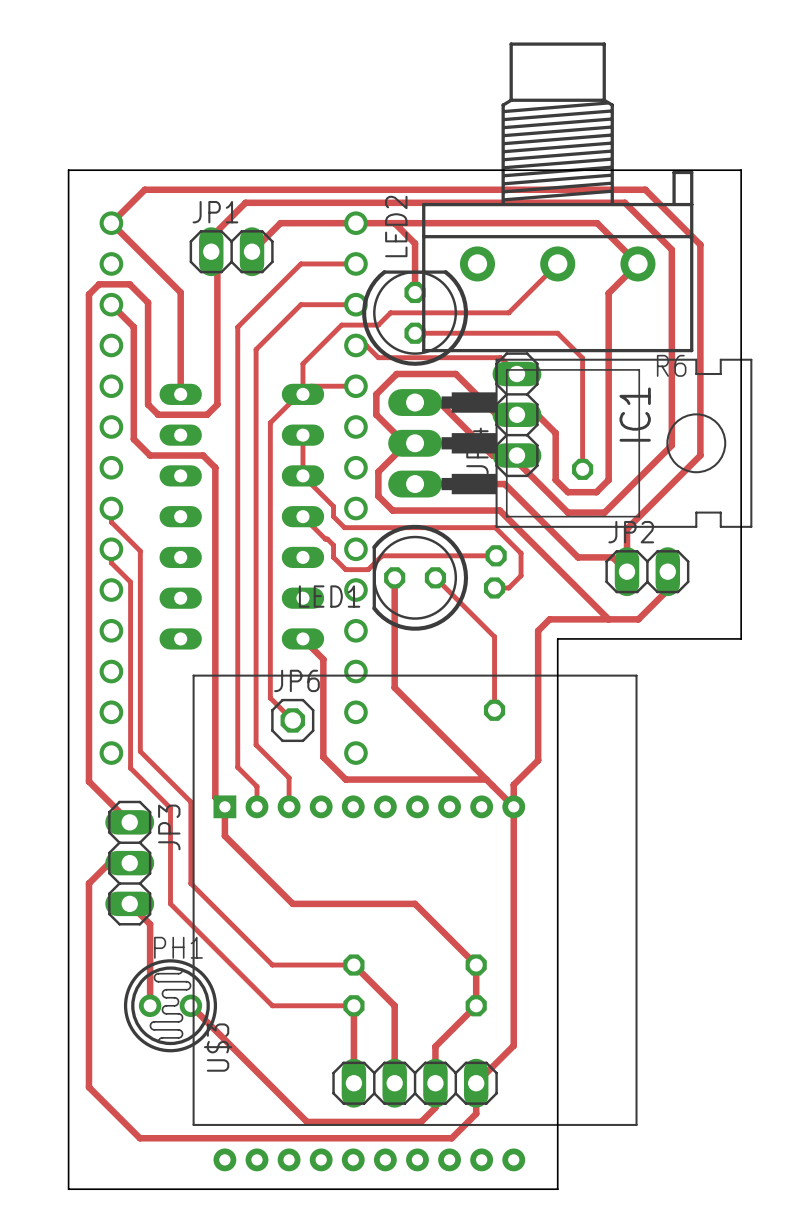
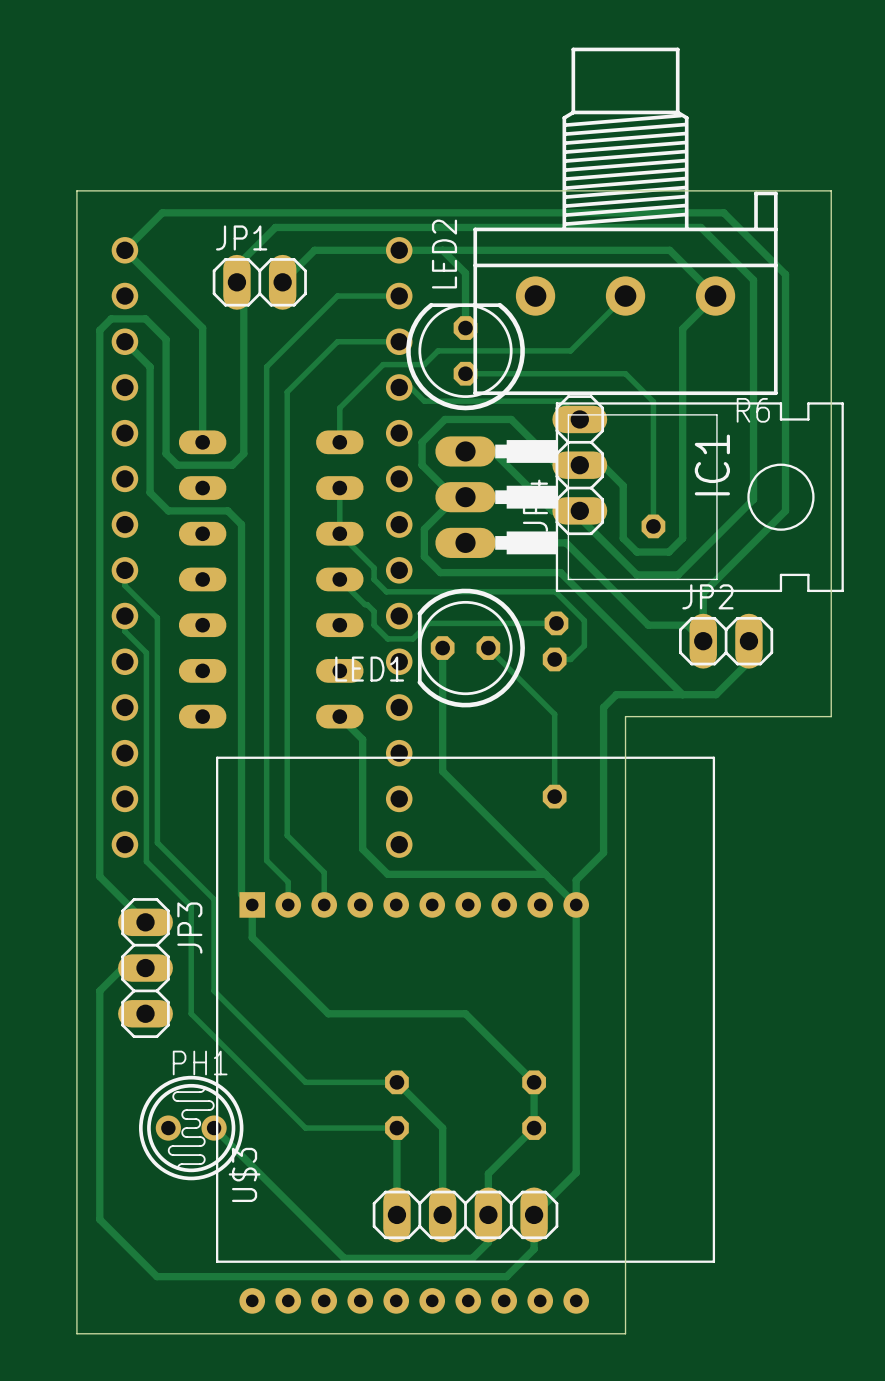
track: (355, 386) (311, 386) (302, 394) (298, 394) (270, 422) (270, 698) (292, 720) -> none
JP6: (292, 720) -> none
track: (129, 903) (150, 924) (150, 1005) -> none

